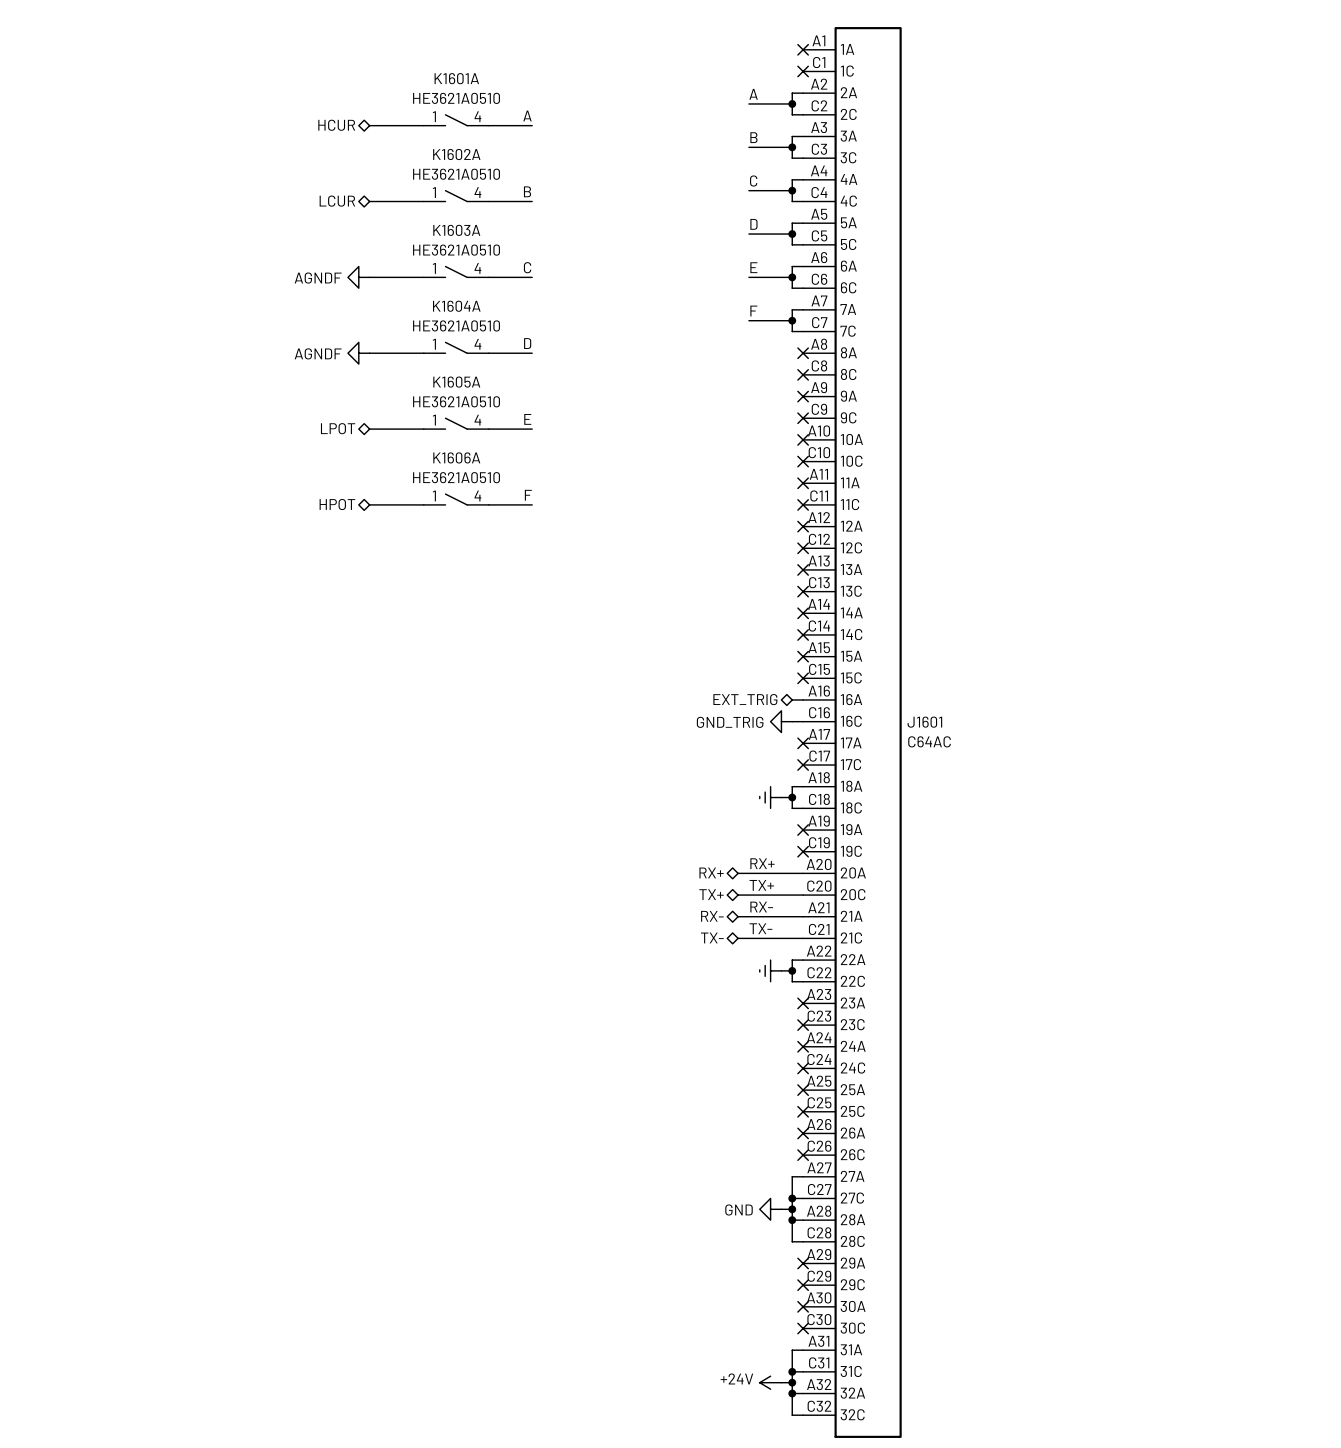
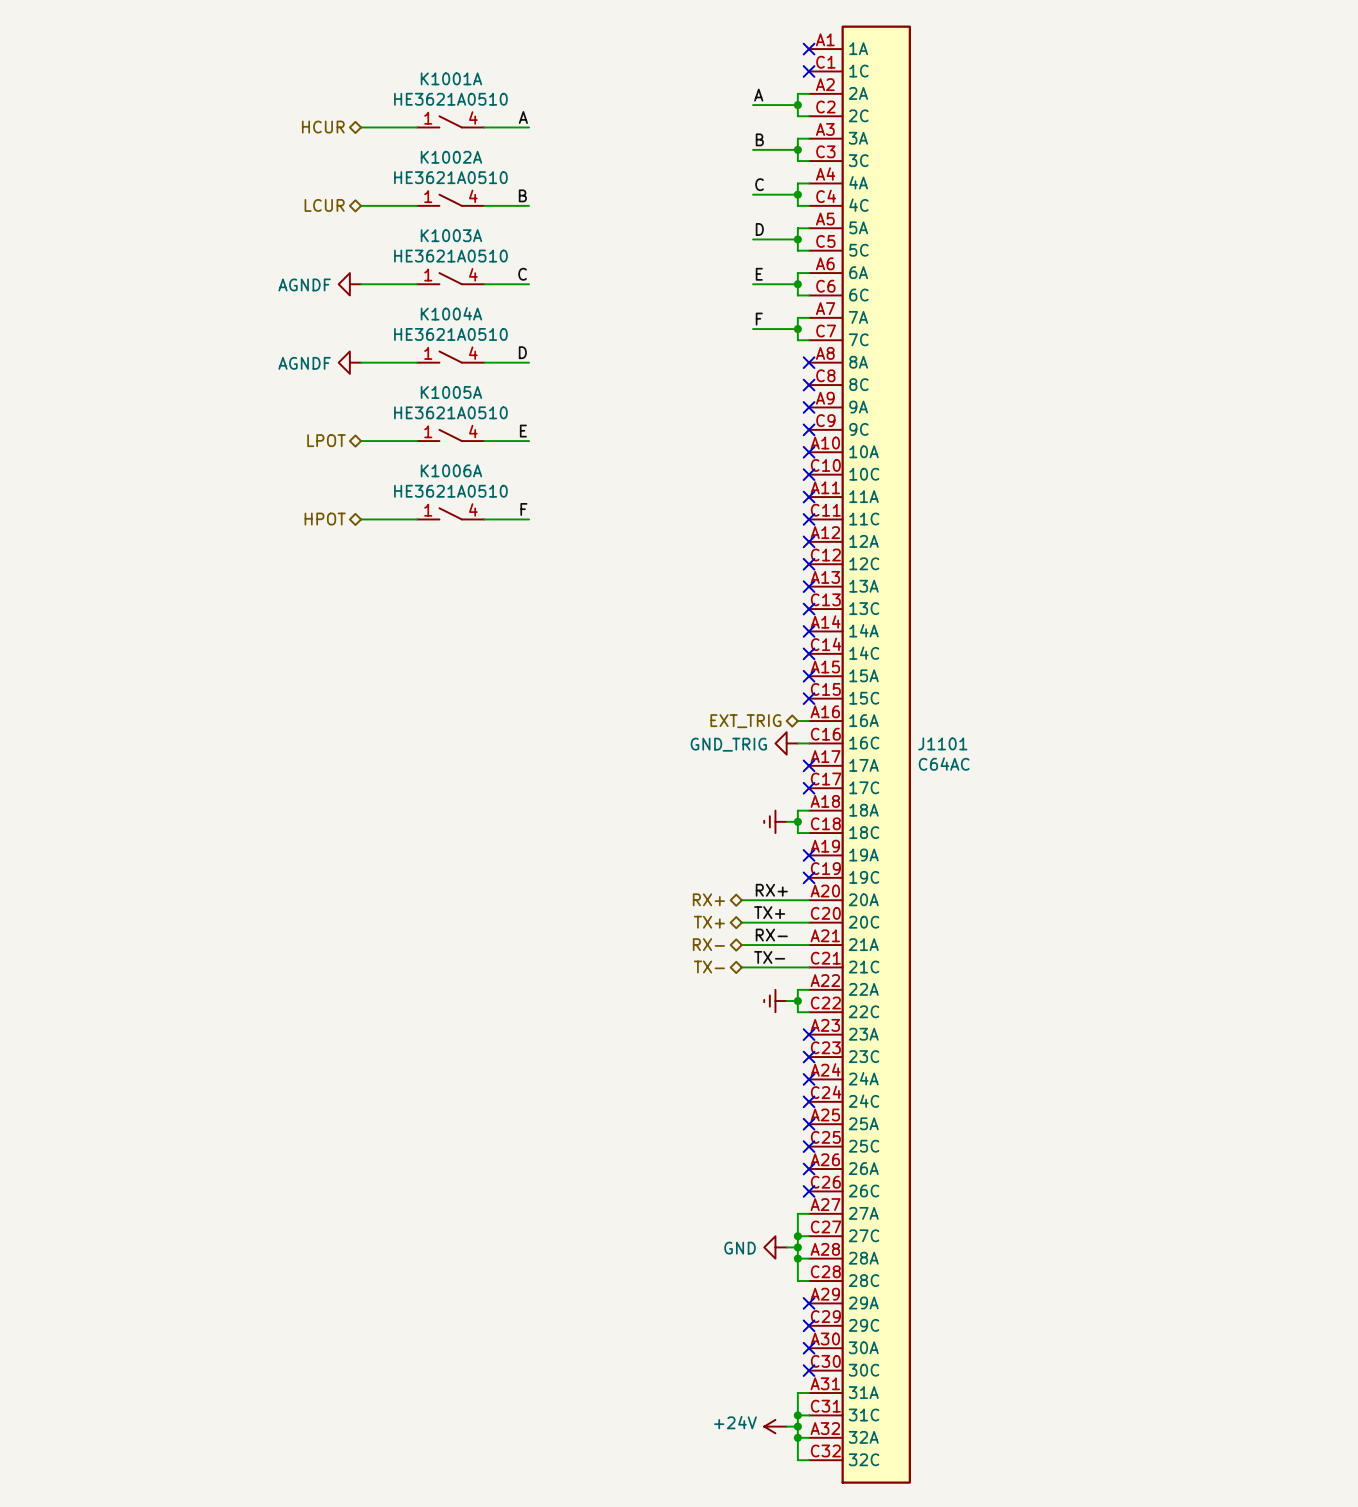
K1601A name: K1601A (456, 78) -> K1001A (451, 78)
K1602A name: K1602A (456, 154) -> K1002A (451, 157)
K1603A name: K1603A (456, 230) -> K1003A (451, 235)
K1604A name: K1604A (456, 306) -> K1004A (451, 313)
K1605A name: K1605A (456, 382) -> K1005A (451, 392)
K1606A name: K1606A (456, 457) -> K1006A (451, 470)
J1601 name: J1601 (924, 722) -> J1101 (942, 743)

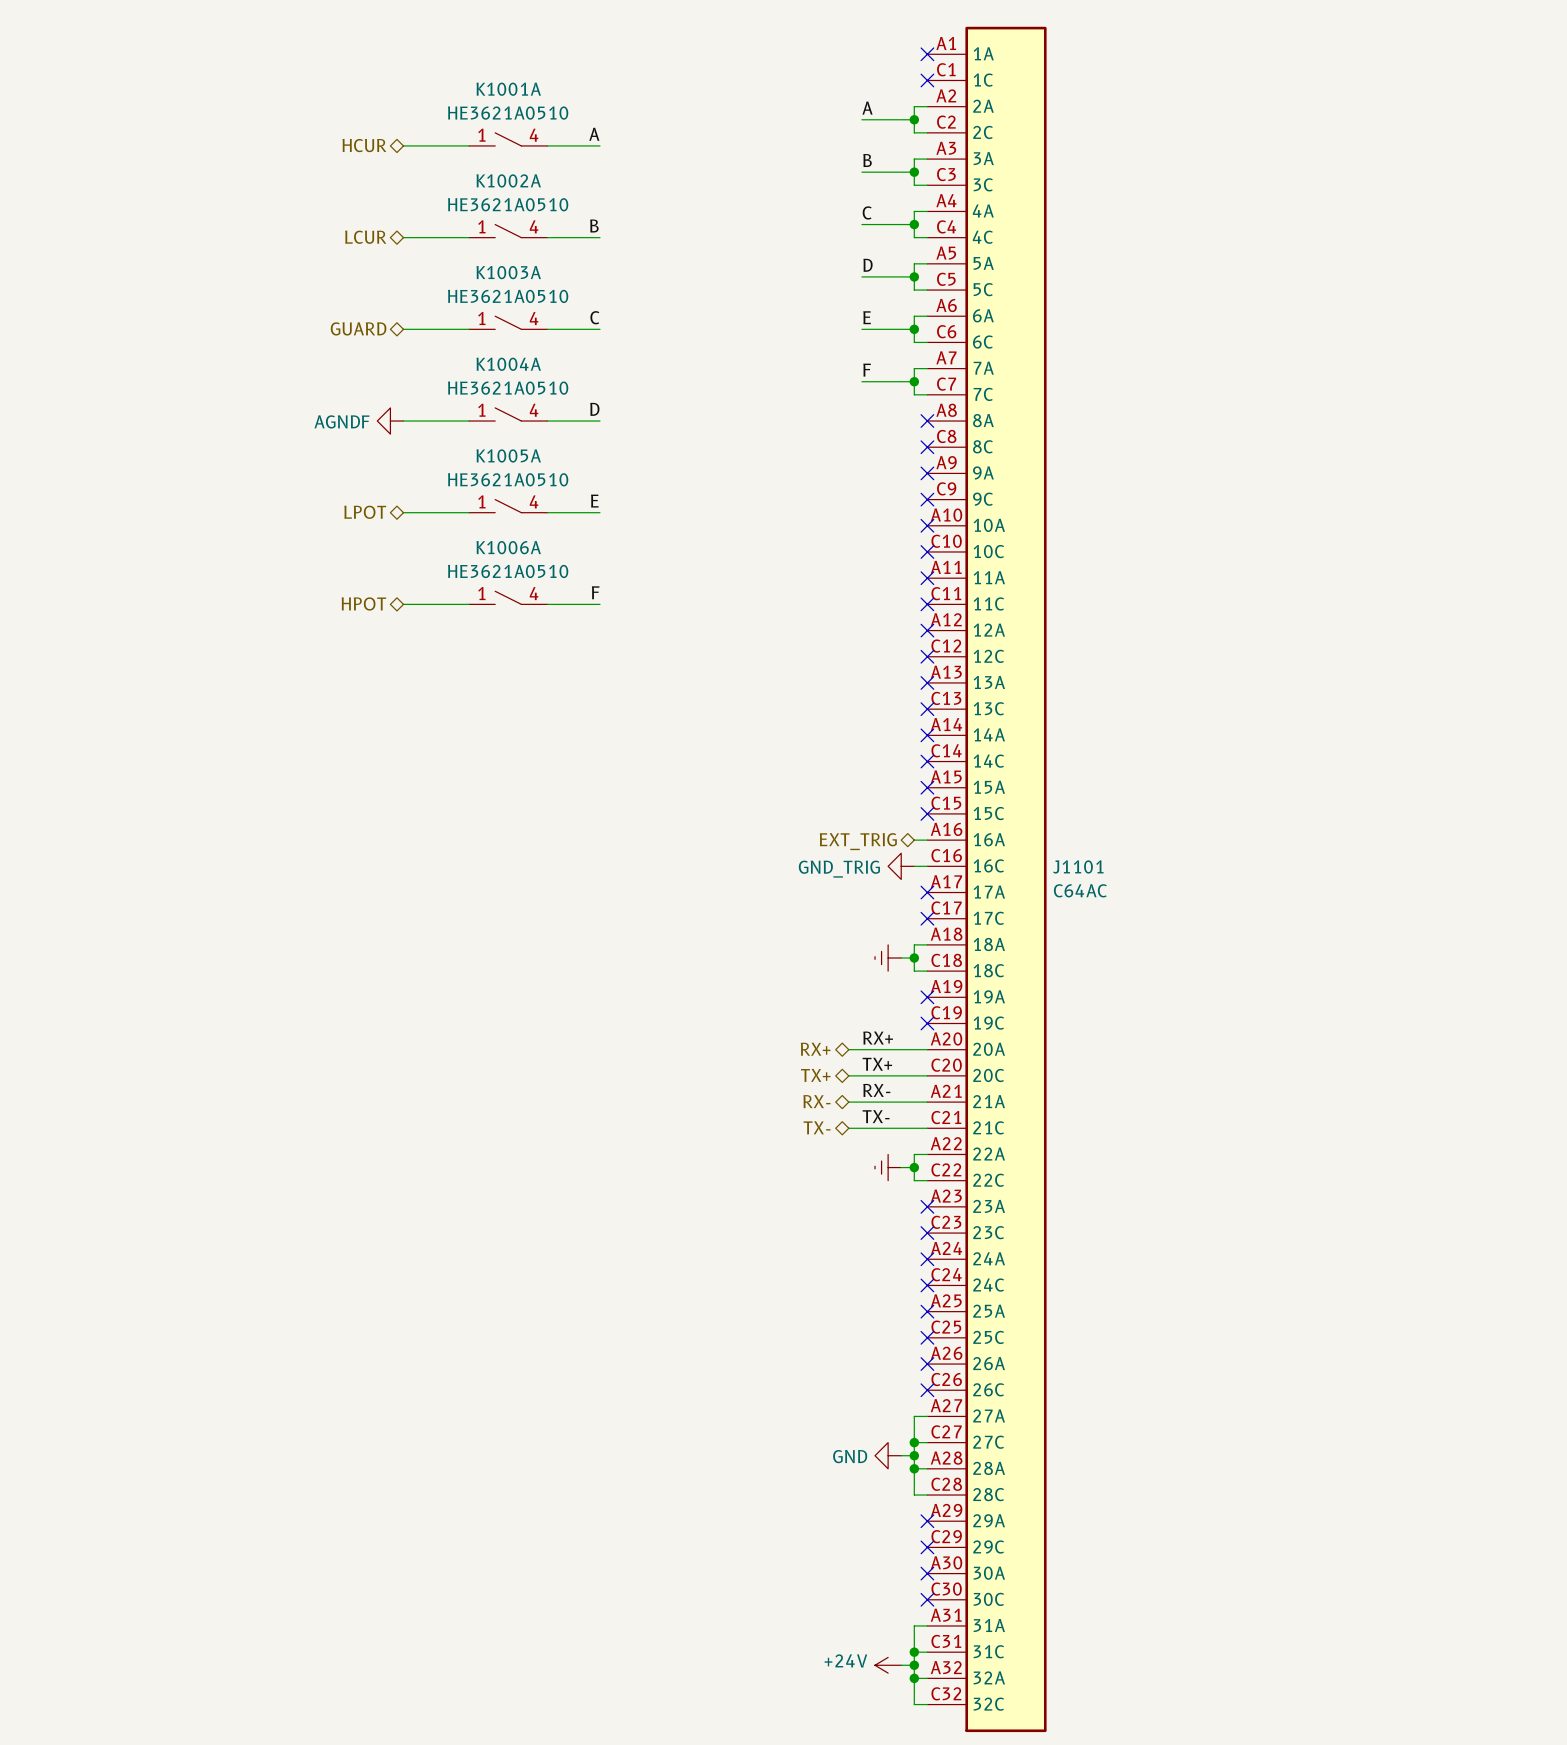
hierarchical label: none -> GUARD (358, 328)
power symbol: AGNDF (349, 284) -> none

